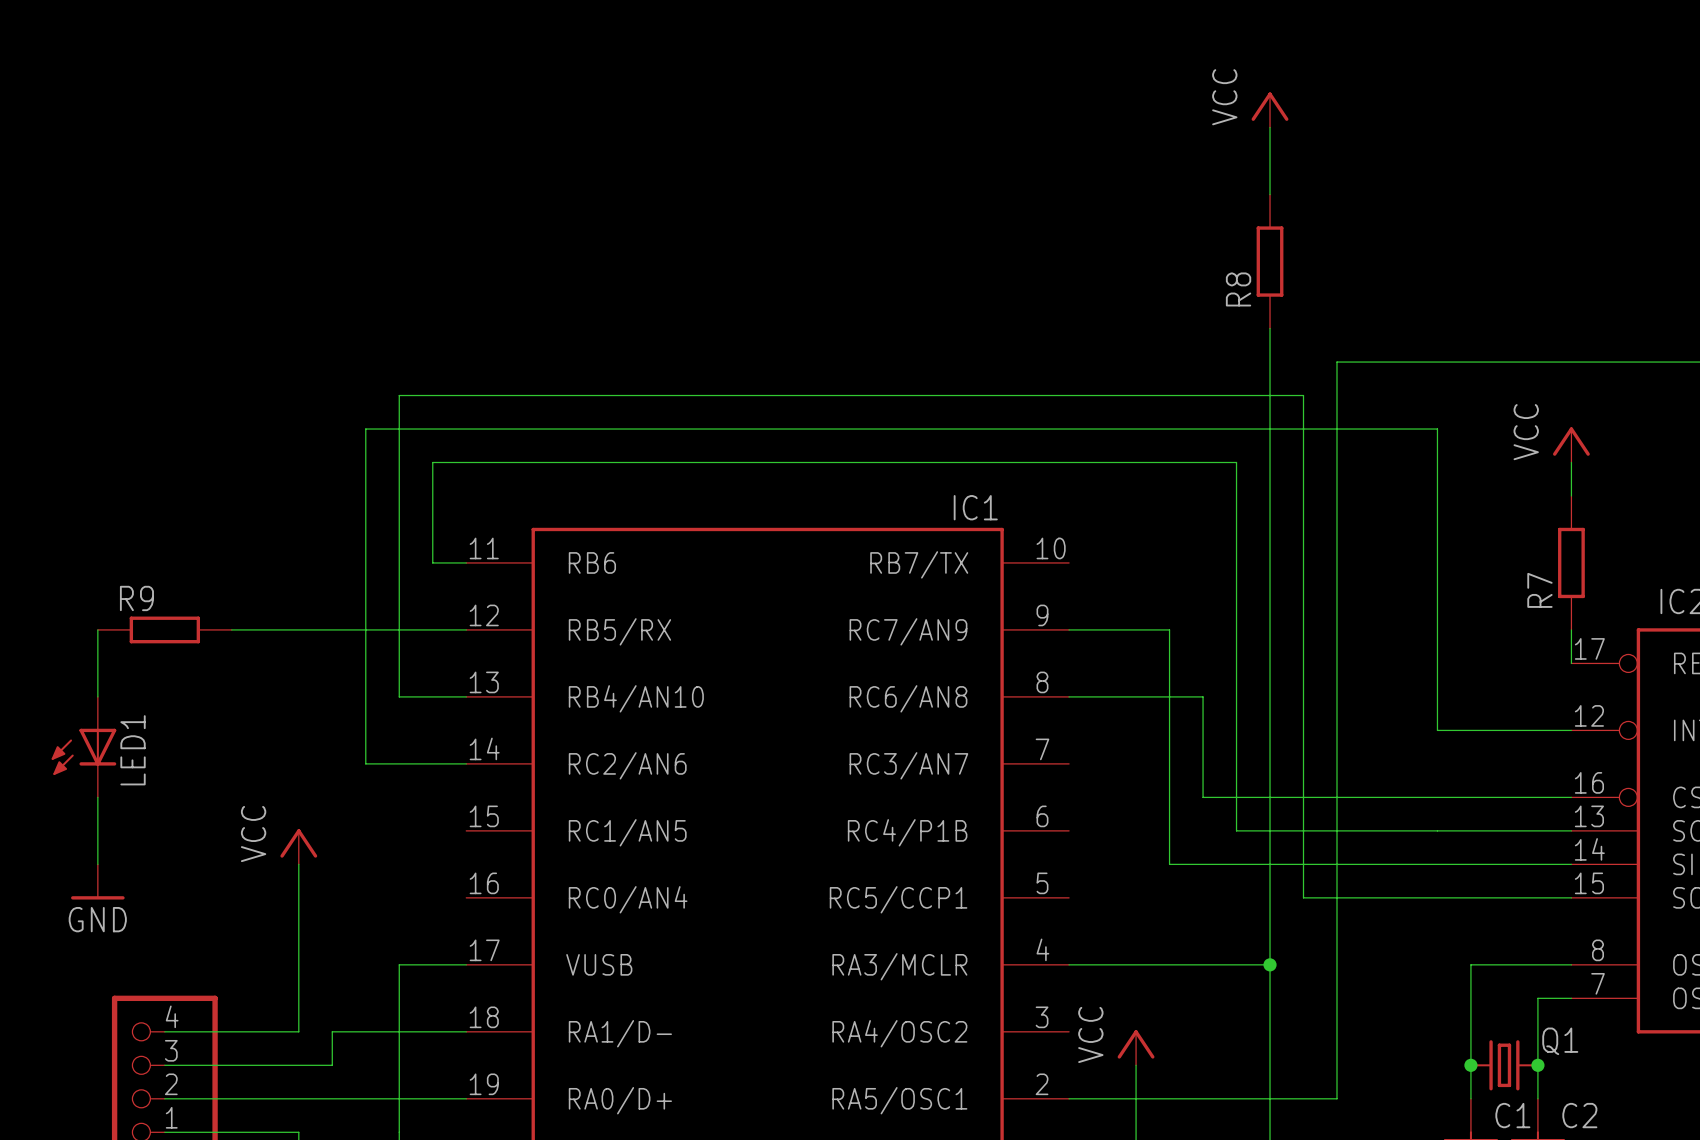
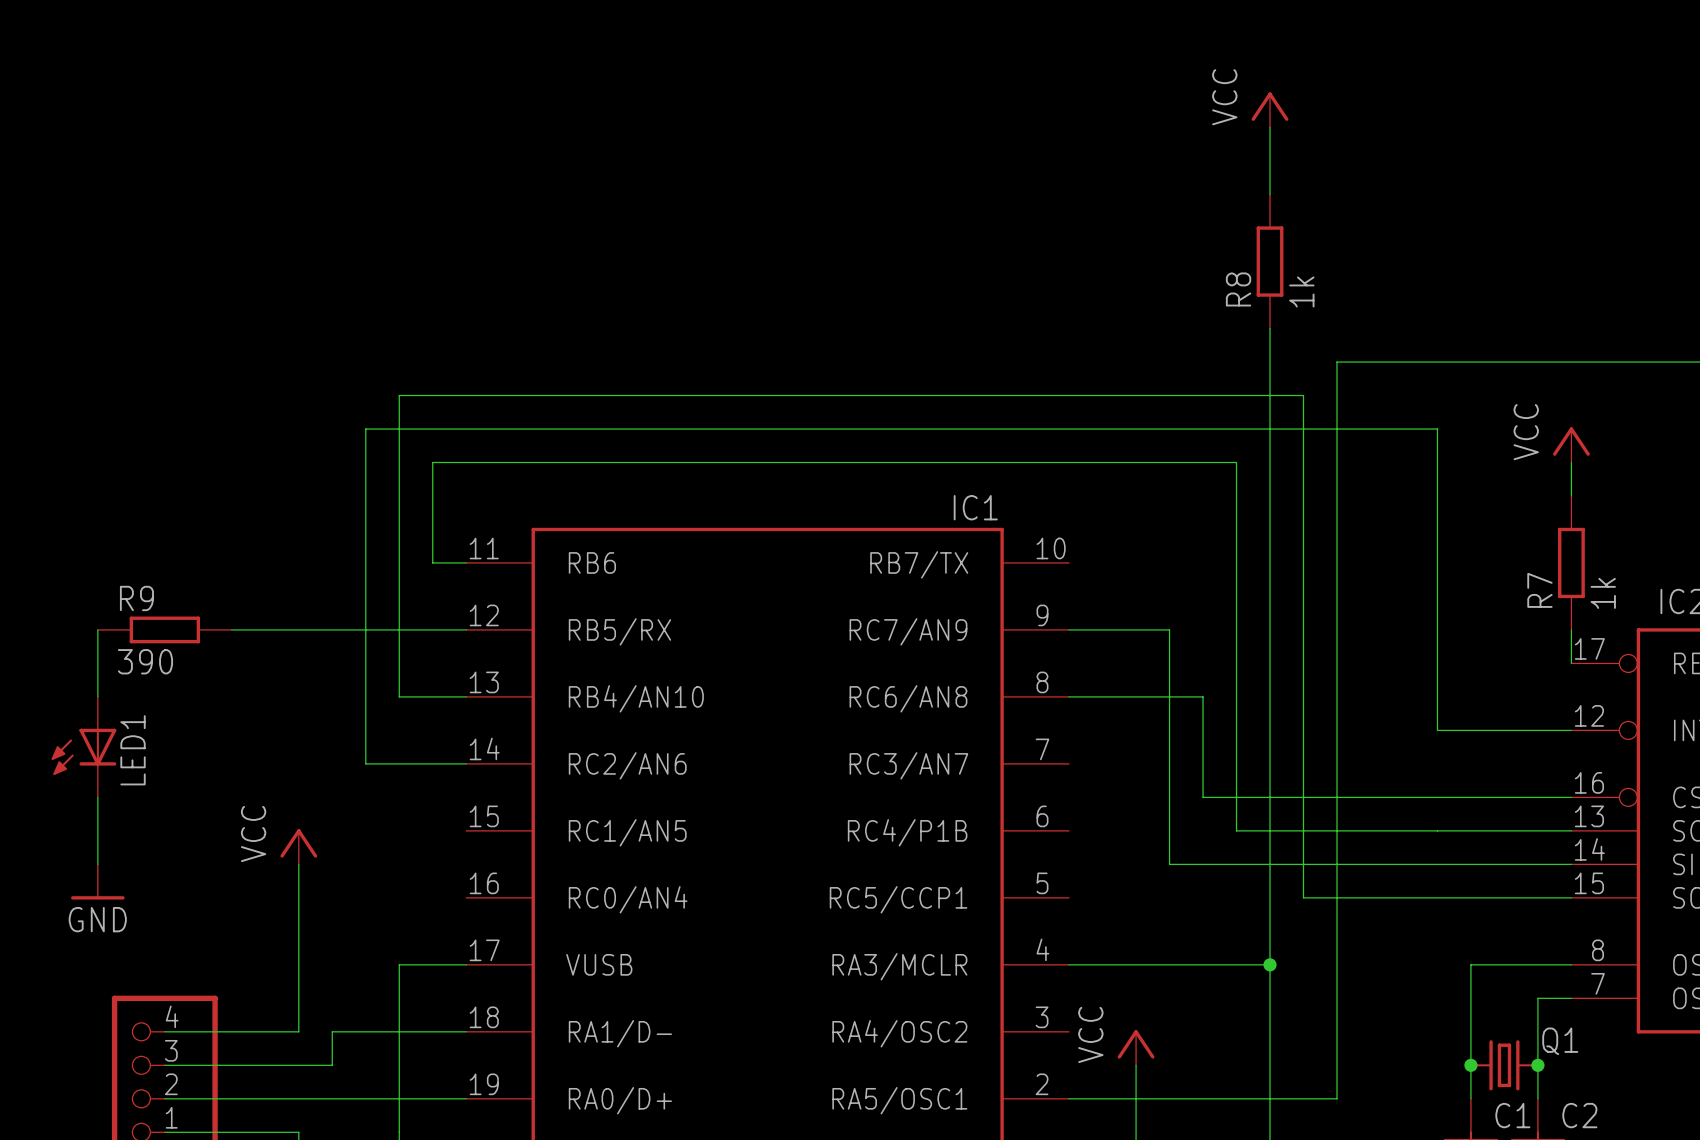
R8 value: none -> 1k (1301, 291)
R7 value: none -> 1k (1603, 593)
R9 value: none -> 390 (145, 661)

